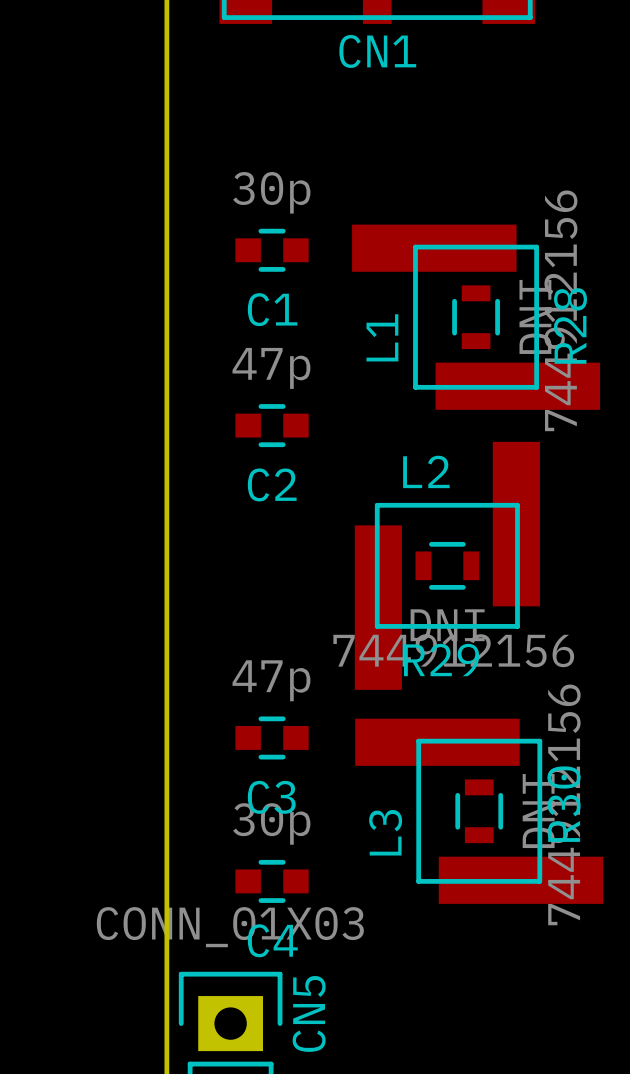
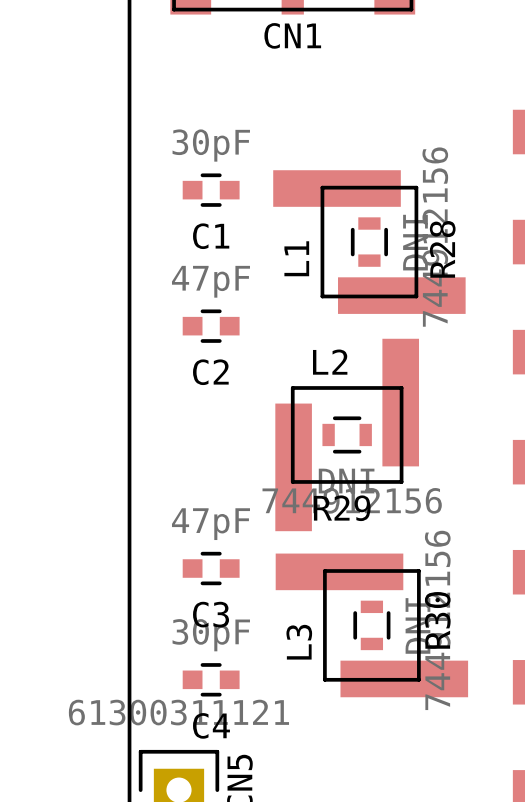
C1 value: 30p (271, 192) -> 30pF (211, 145)
C2 value: 47p (271, 368) -> 47pF (210, 281)
C3 value: 47p (271, 680) -> 47pF (210, 524)
C4 value: 30p (271, 823) -> 30pF (211, 635)
CN5 value: CONN_01X03 (230, 927) -> 61300311121 (178, 712)

